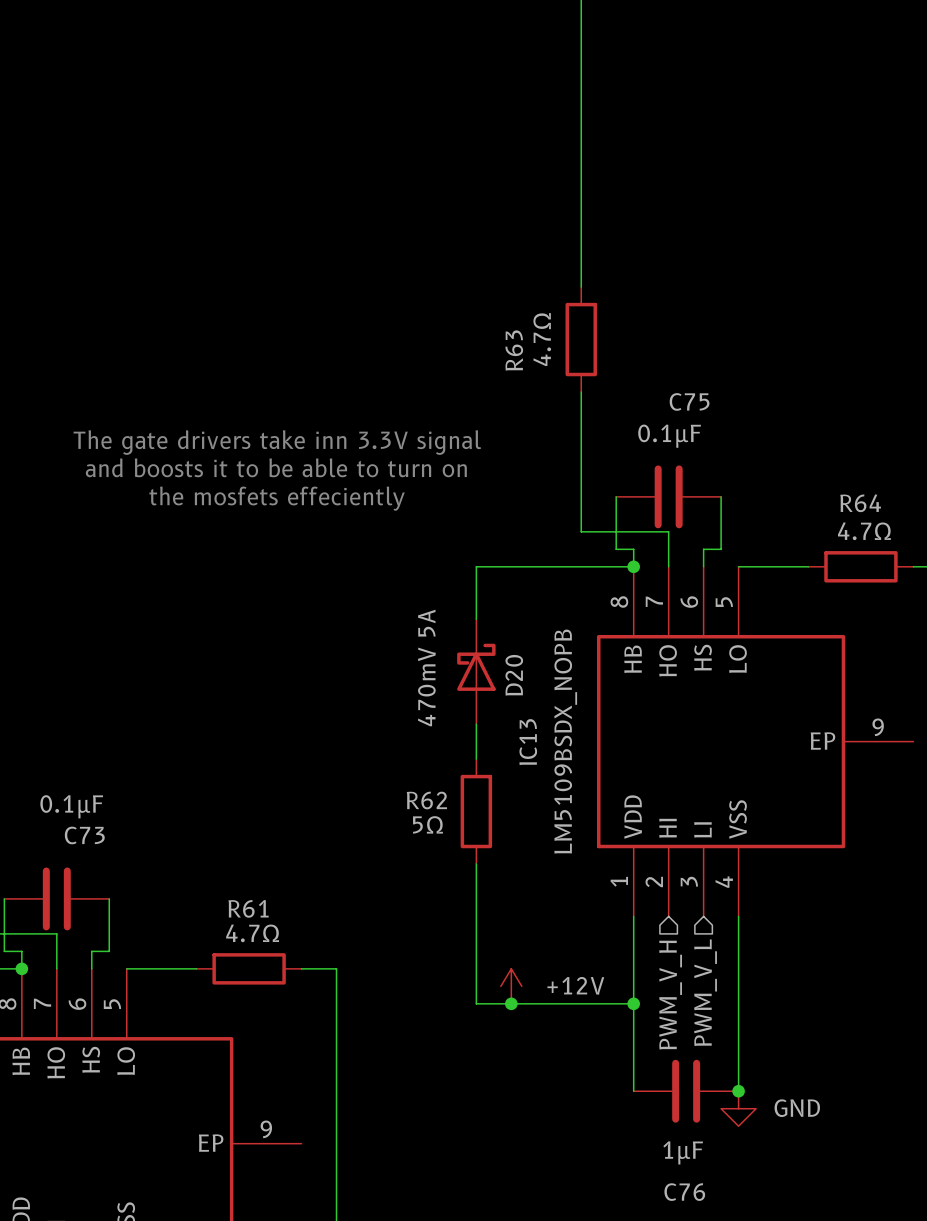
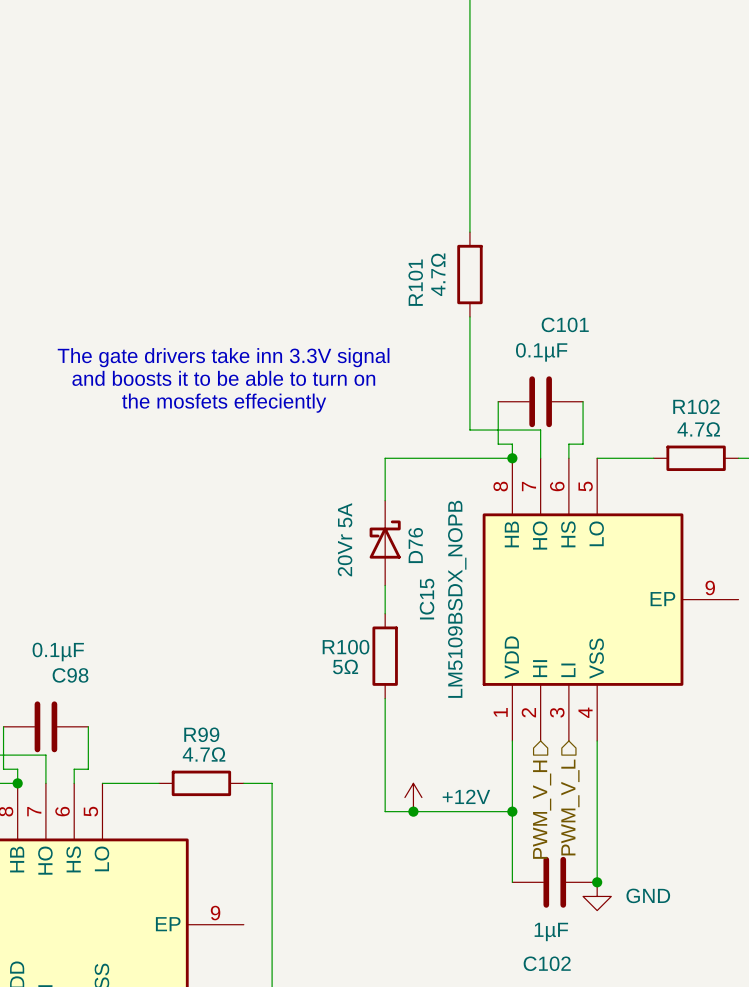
R63 name: R63 (514, 350) -> R101 (415, 282)
C75 name: C75 (689, 401) -> C101 (565, 324)
R64 name: R64 (860, 503) -> R102 (696, 406)
D20 value: 470mV 5A (426, 667) -> 20Vr 5A (345, 539)
D20 name: D20 (514, 675) -> D76 (415, 545)
IC13 name: IC13 (528, 742) -> IC15 (427, 599)
R62 name: R62 (426, 800) -> R100 (346, 647)
C73 name: C73 (84, 835) -> C98 (70, 675)
R61 name: R61 (248, 908) -> R99 (201, 734)
C76 name: C76 (684, 1192) -> C102 (547, 963)

